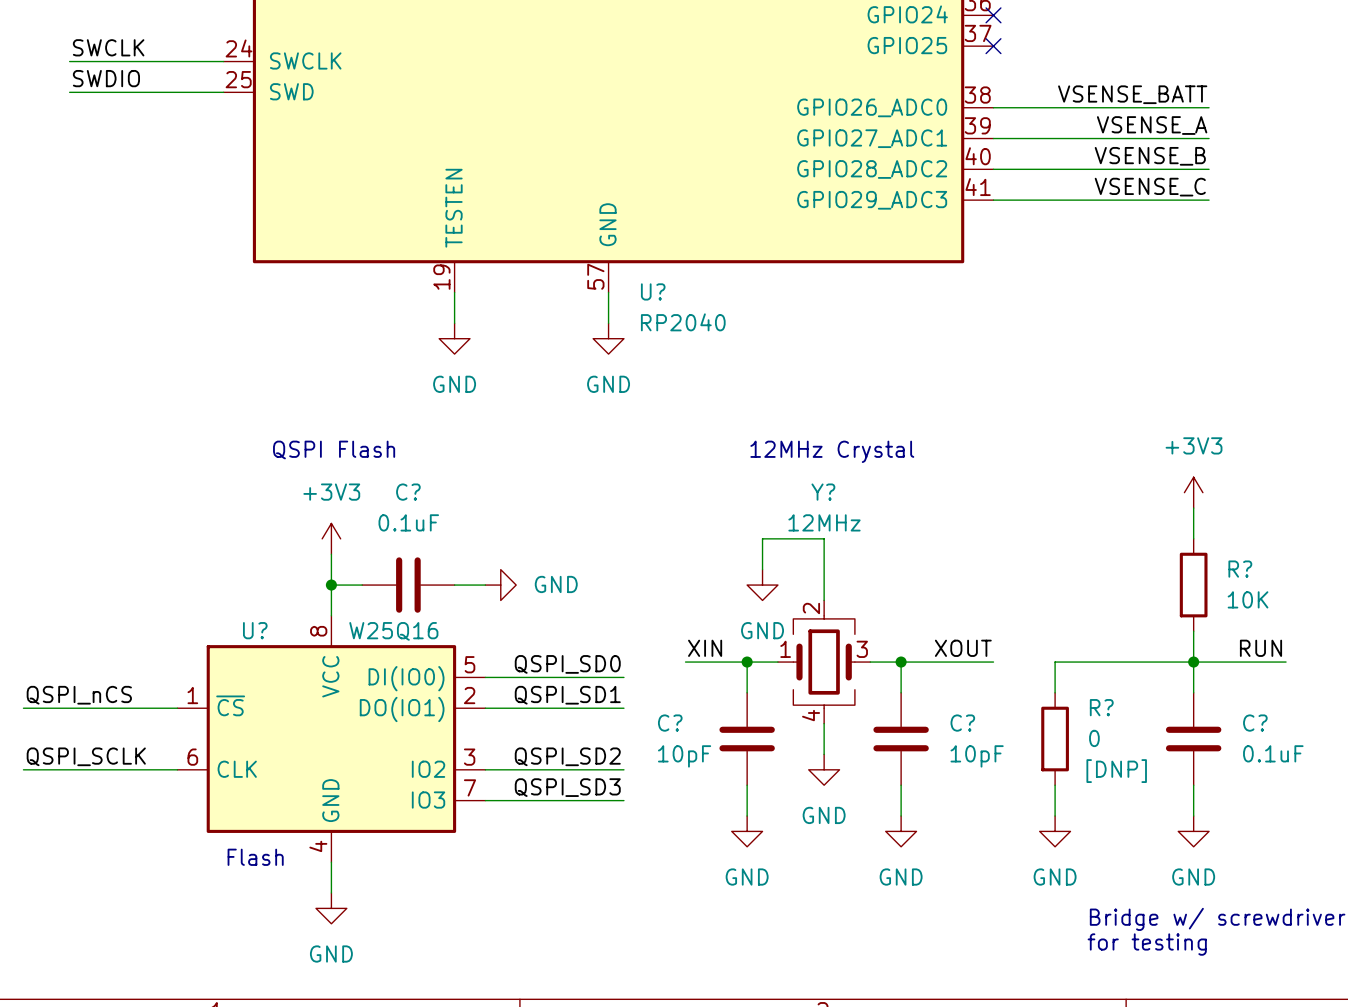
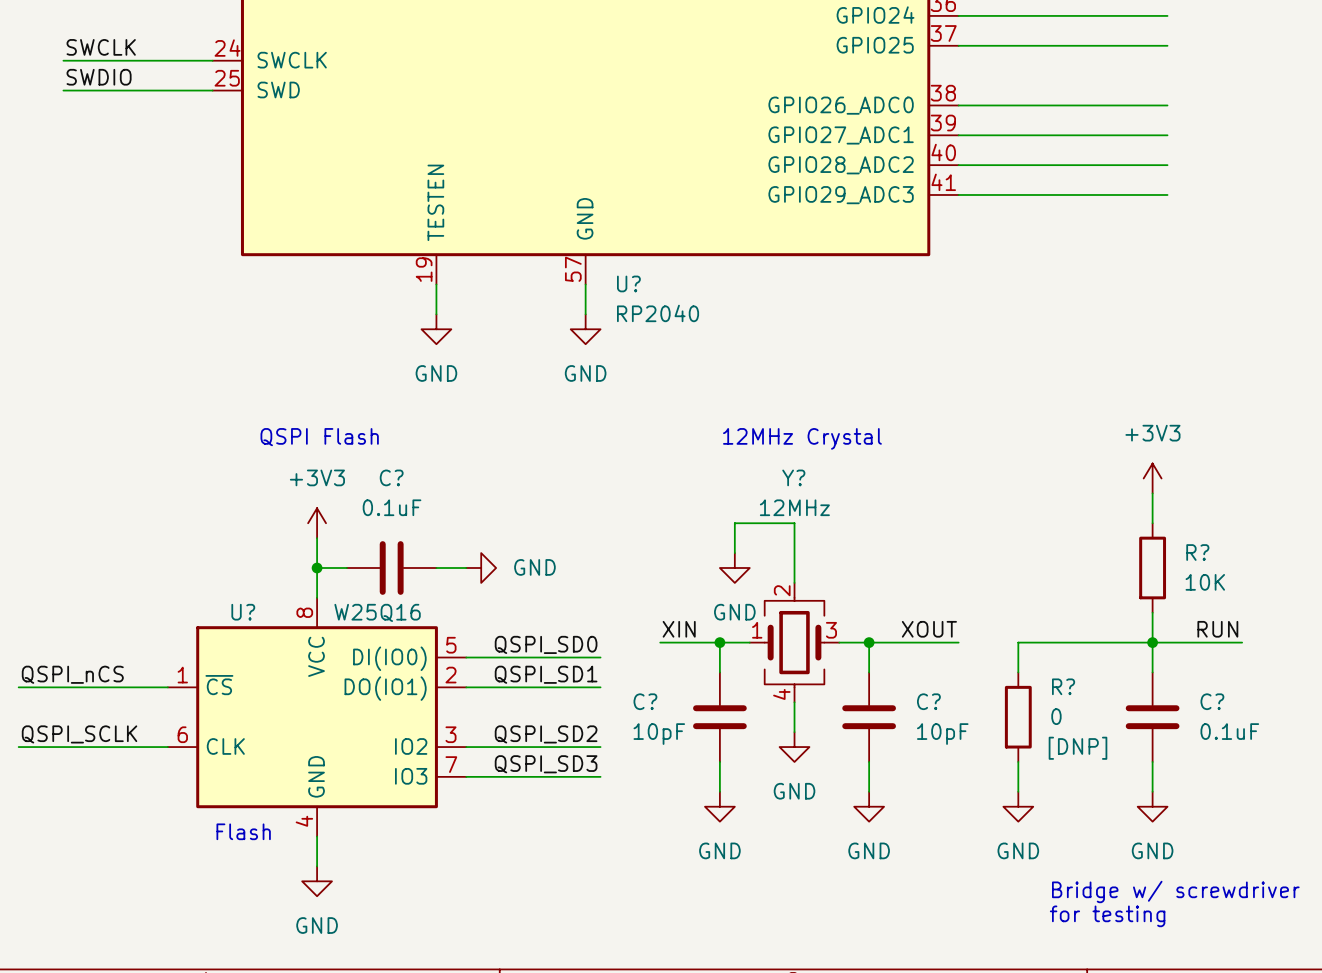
wire: none -> (958, 15) (1167, 15)
no-connect mark: (993, 15) -> none
wire: none -> (958, 45) (1167, 45)
no-connect mark: (993, 46) -> none
label: VSENSE_BATT (1132, 94) -> none
label: VSENSE_A (1152, 125) -> none
label: VSENSE_B (1150, 156) -> none
label: VSENSE_C (1150, 187) -> none

